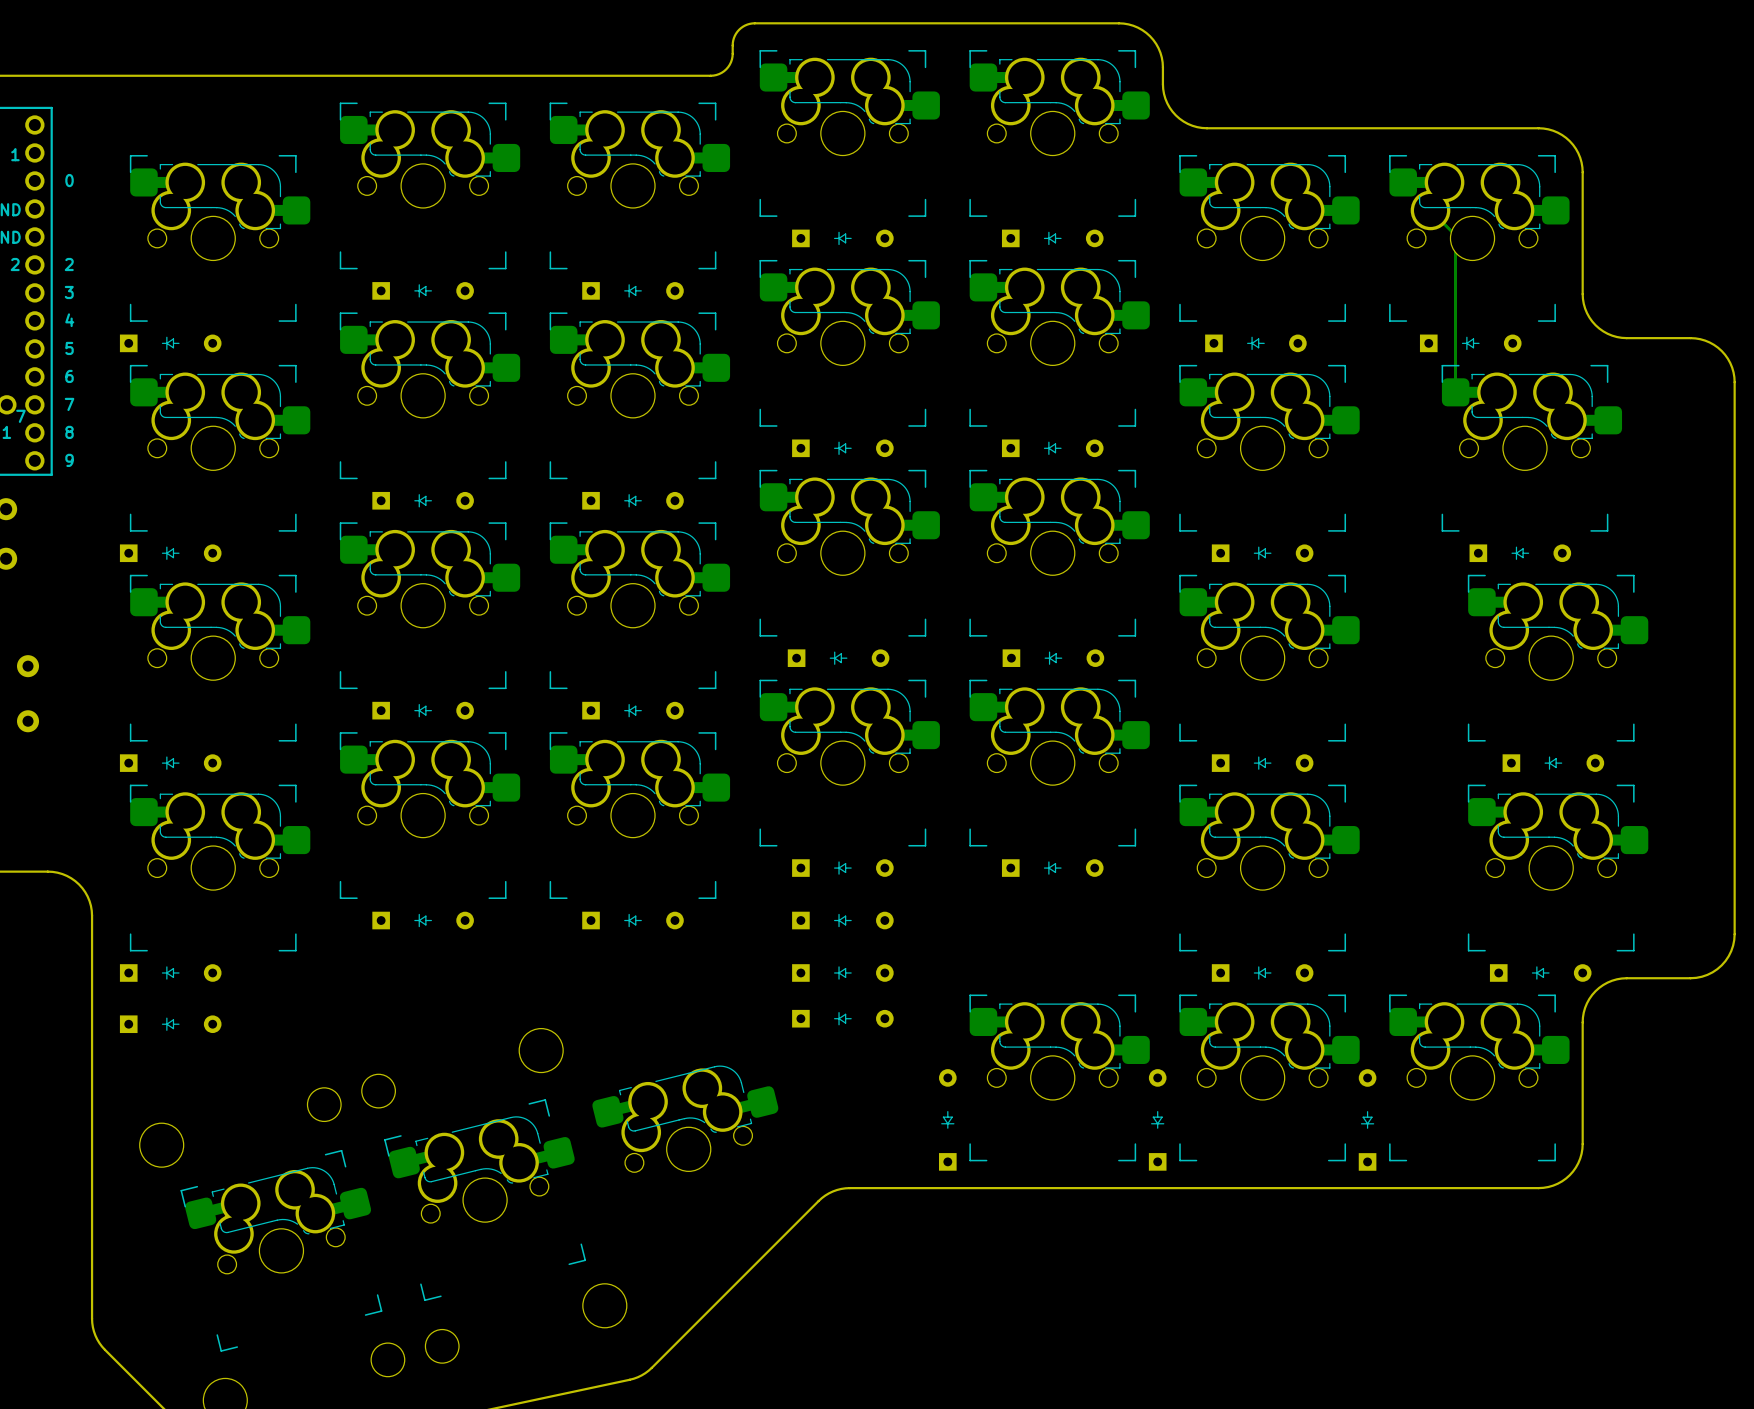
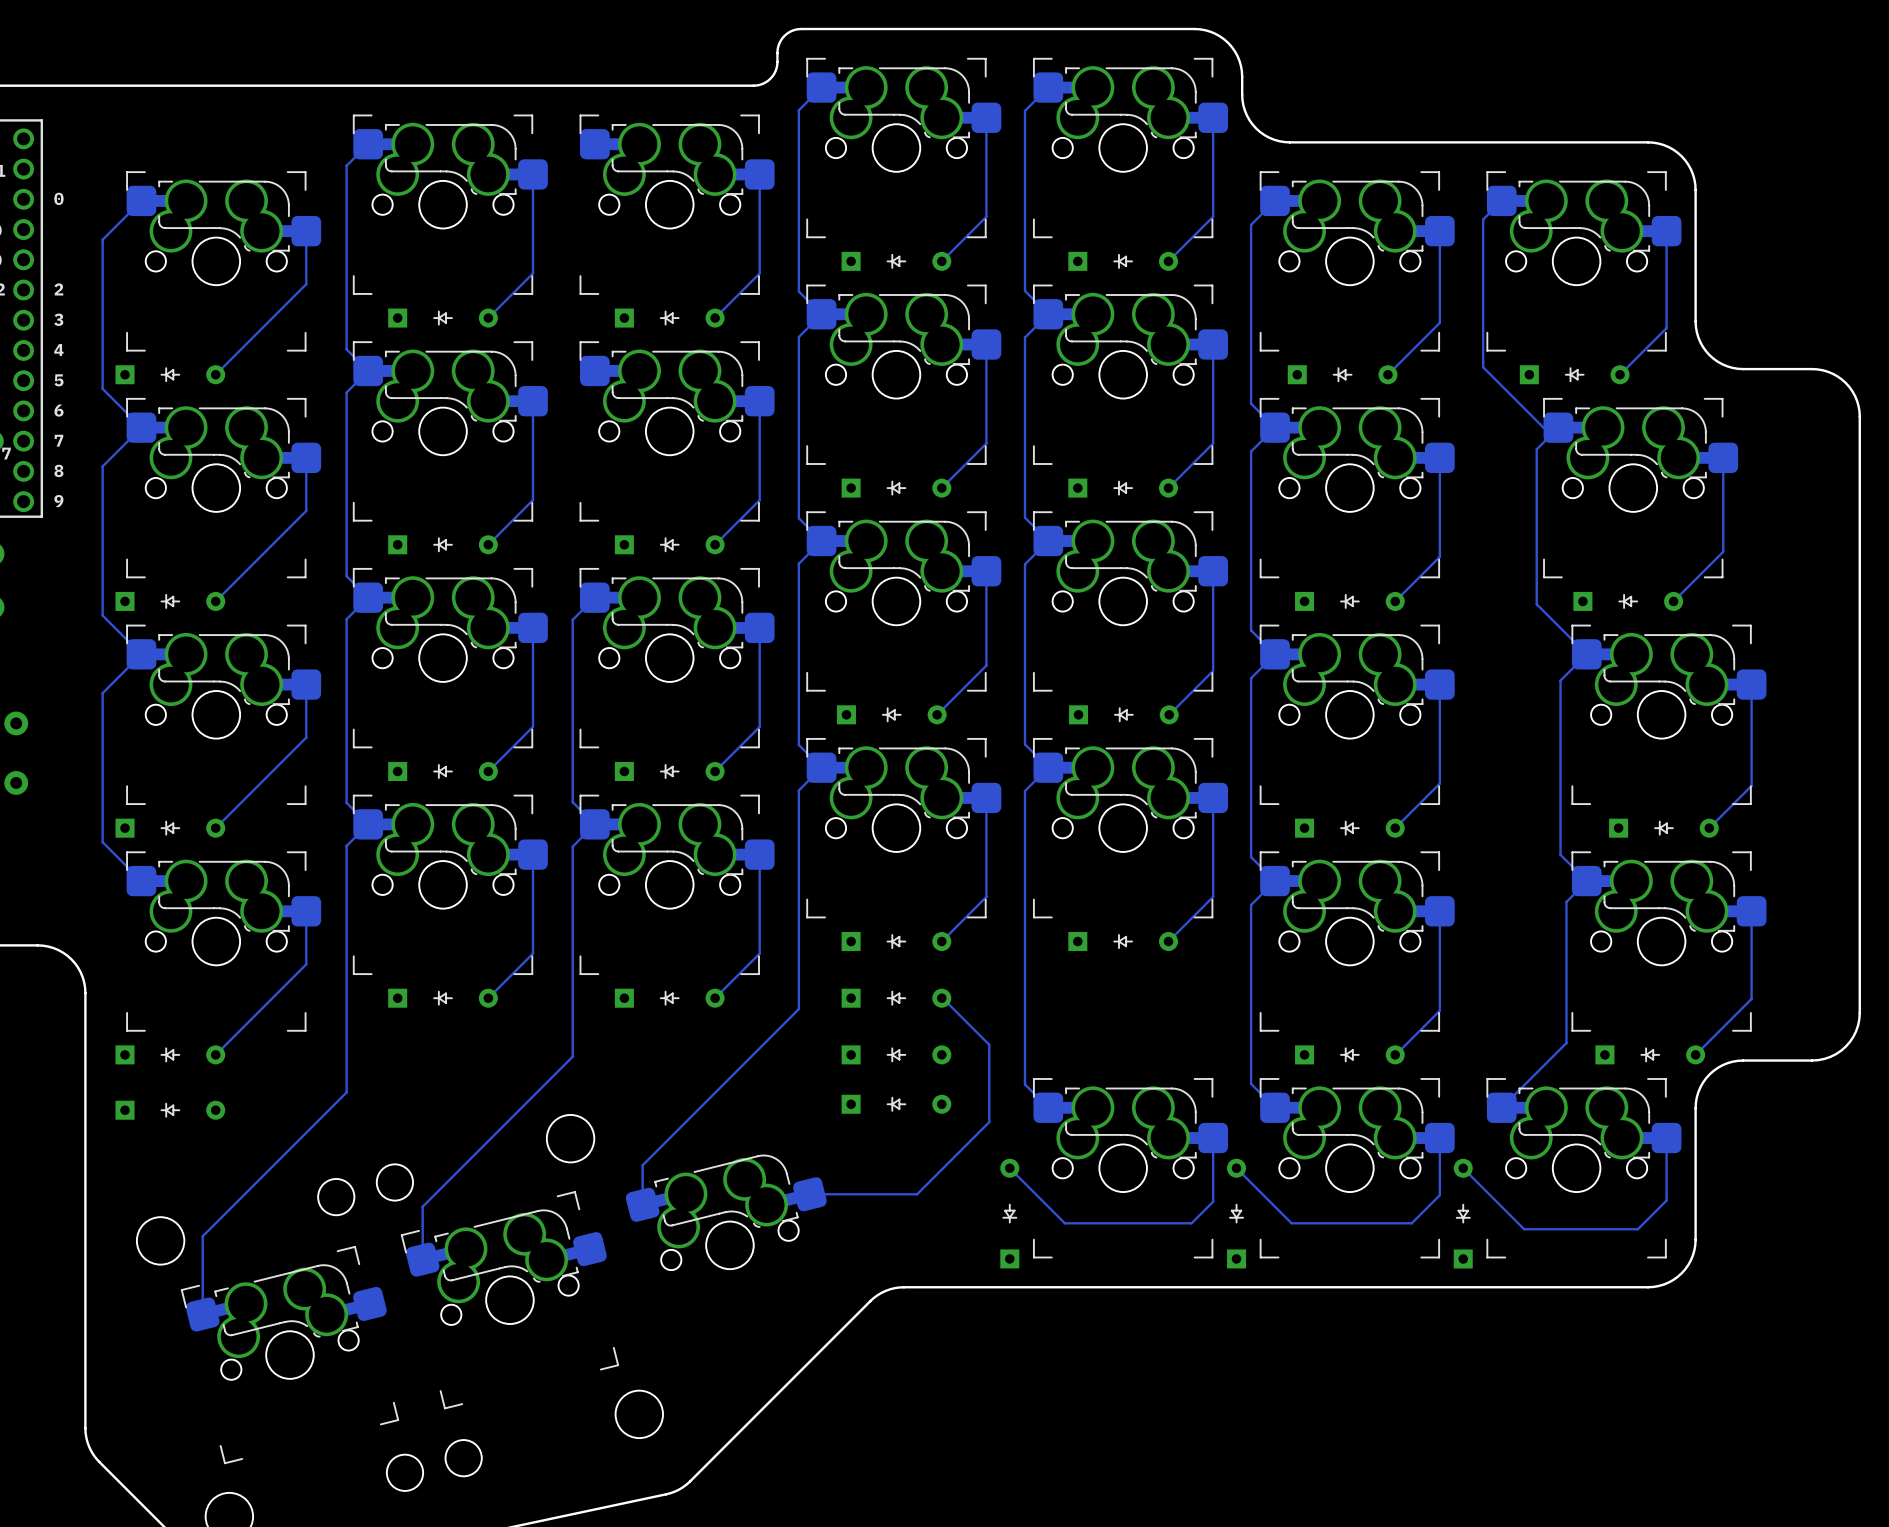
track: none -> (821, 87) (798, 110) (798, 291) (821, 314) (798, 337) (798, 518) (821, 540) (798, 563) (798, 744) (821, 767) (798, 790) (798, 1009) (642, 1165) (642, 1204)
track: none -> (1048, 87) (1024, 110) (1024, 290) (1048, 314) (1024, 337) (1024, 517) (1048, 540) (1024, 564) (1024, 744) (1048, 767) (1024, 791) (1024, 1084) (1048, 1107)
track: none -> (986, 117) (986, 216) (941, 261)
track: none -> (1213, 117) (1213, 216) (1168, 261)
track: none -> (368, 144) (346, 165) (346, 349) (368, 370) (346, 392) (346, 576) (368, 597) (346, 619) (346, 802) (368, 824) (346, 845) (346, 1092) (202, 1236) (202, 1314)
track: none -> (532, 174) (532, 273) (488, 318)
track: none -> (759, 174) (759, 273) (715, 318)
track: none -> (141, 200) (102, 239) (102, 388) (141, 427) (102, 466) (102, 615) (141, 654) (102, 693) (102, 842) (141, 881)
track: none -> (1275, 200) (1251, 224) (1251, 403) (1275, 427) (1251, 451) (1251, 630) (1275, 654) (1251, 678) (1251, 857) (1275, 881) (1251, 904) (1251, 1083) (1275, 1107)
track: none -> (1501, 200) (1483, 219) (1483, 367) (1543, 427) (1558, 427) (1536, 449) (1536, 604) (1586, 654) (1560, 680) (1560, 854) (1586, 881) (1566, 901) (1566, 1043) (1501, 1107)
track: none -> (306, 231) (306, 284) (215, 374)
track: none -> (1439, 231) (1439, 322) (1387, 374)
track: (1430, 210) (1455, 235) (1455, 392) -> none
track: none -> (1666, 231) (1666, 328) (1620, 374)
track: none -> (986, 344) (986, 443) (941, 488)
track: none -> (1213, 344) (1213, 443) (1168, 488)
track: none -> (532, 401) (532, 500) (488, 544)
track: none -> (759, 401) (759, 500) (715, 544)
track: none -> (306, 457) (306, 510) (215, 601)
track: none -> (1439, 457) (1439, 556) (1395, 601)
track: none -> (1723, 457) (1723, 551) (1673, 601)
track: none -> (986, 571) (986, 665) (937, 714)
track: none -> (1213, 571) (1213, 670) (1169, 714)
track: none -> (594, 597) (572, 619) (572, 802) (594, 824) (572, 846) (572, 1056) (422, 1206) (422, 1259)
track: none -> (532, 627) (532, 726) (488, 771)
track: none -> (759, 627) (759, 726) (715, 771)
track: none -> (306, 684) (306, 737) (215, 828)
track: none -> (1439, 684) (1439, 783) (1395, 828)
track: none -> (1751, 684) (1751, 785) (1709, 828)
track: none -> (986, 797) (986, 896) (941, 941)
track: none -> (1213, 797) (1213, 896) (1168, 941)
track: none -> (532, 854) (532, 953) (488, 998)
track: none -> (759, 854) (759, 953) (715, 998)
track: none -> (306, 911) (306, 964) (215, 1054)
track: none -> (1439, 911) (1439, 1010) (1395, 1054)
track: none -> (1751, 911) (1751, 998) (1695, 1054)
track: none -> (941, 998) (989, 1044) (989, 1122) (917, 1194) (809, 1194)
track: none -> (1213, 1138) (1213, 1201) (1191, 1223) (1064, 1223) (1009, 1168)
track: none -> (1439, 1138) (1439, 1195) (1411, 1223) (1291, 1223) (1236, 1168)
track: none -> (1666, 1138) (1666, 1200) (1637, 1229) (1524, 1229) (1463, 1168)

